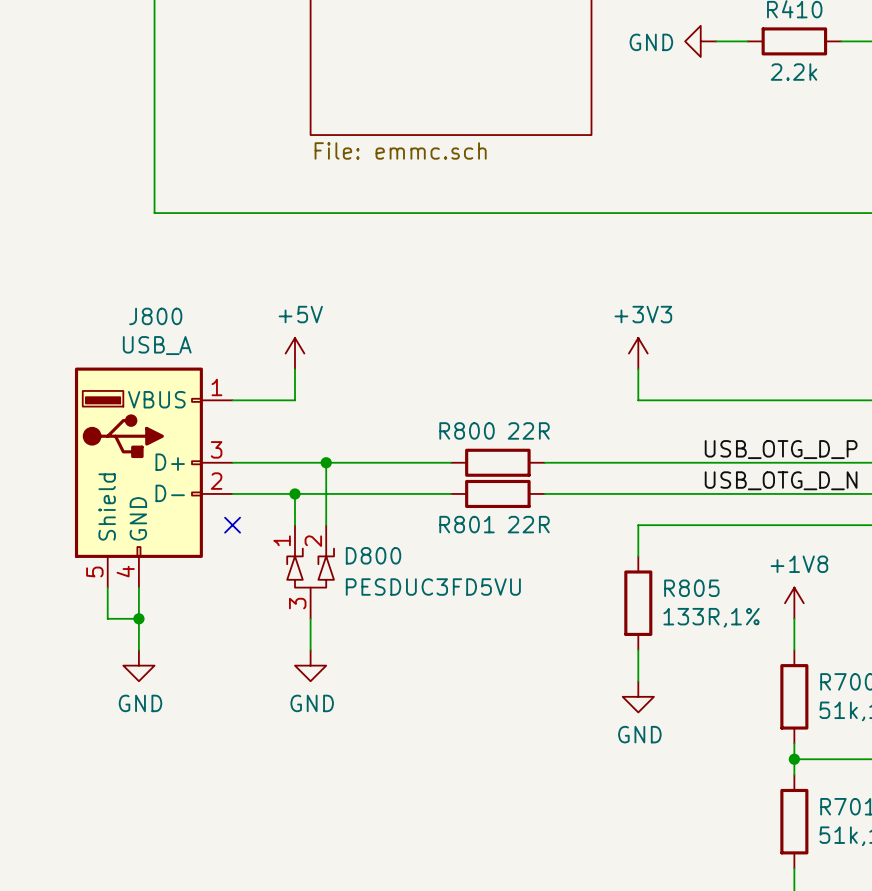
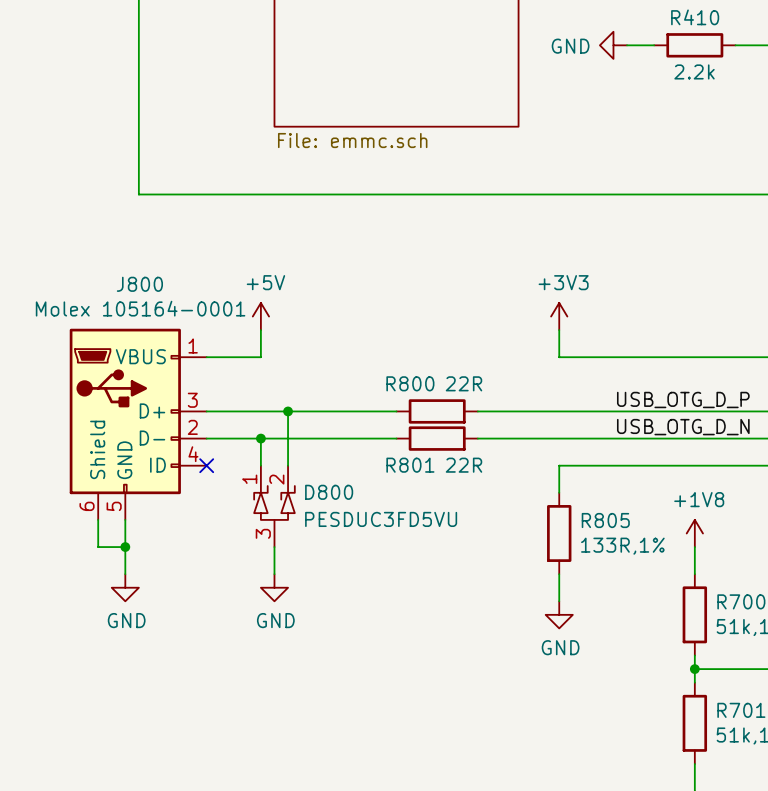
J800 value: USB_A (157, 345) -> Molex 105164-0001 (140, 308)
J800 symbol: [74, 367, 233, 588] -> [69, 328, 207, 520]

